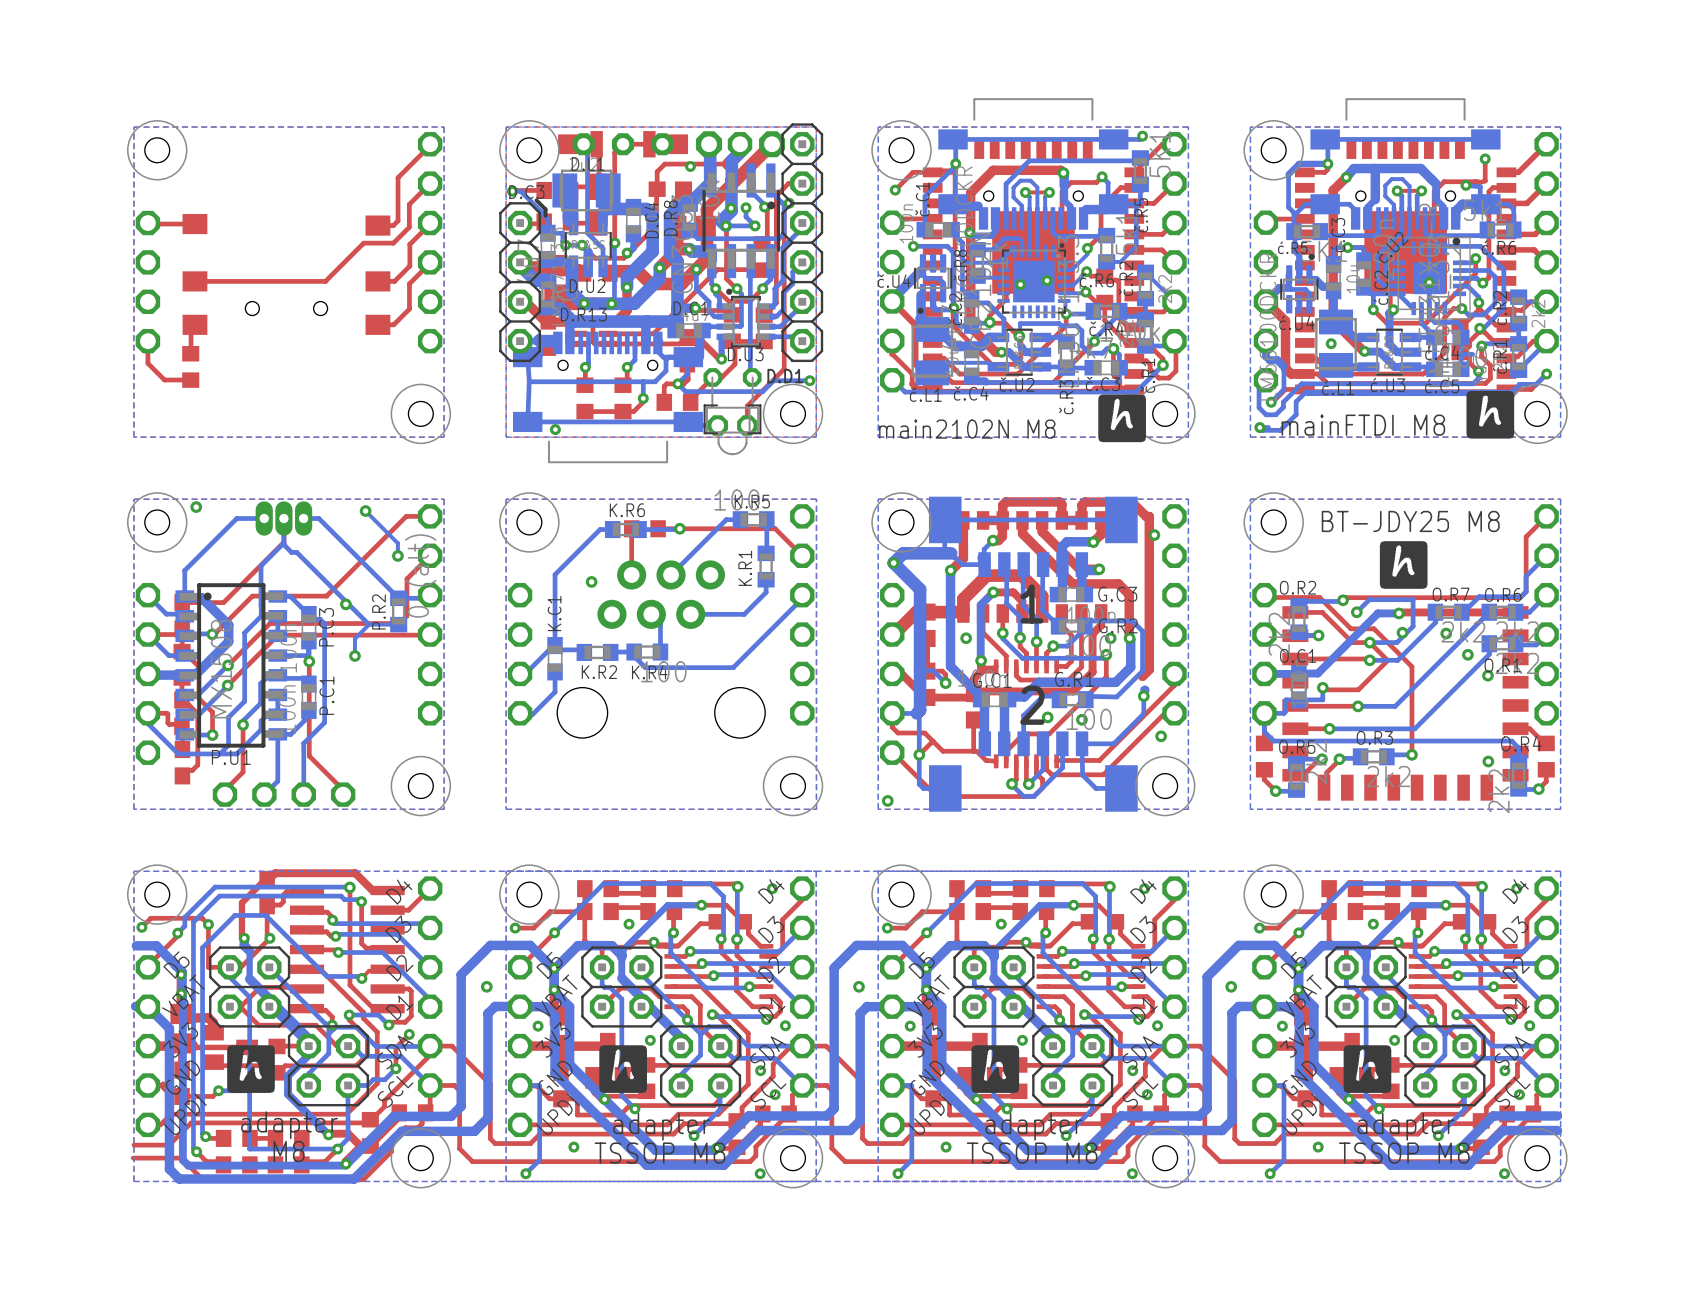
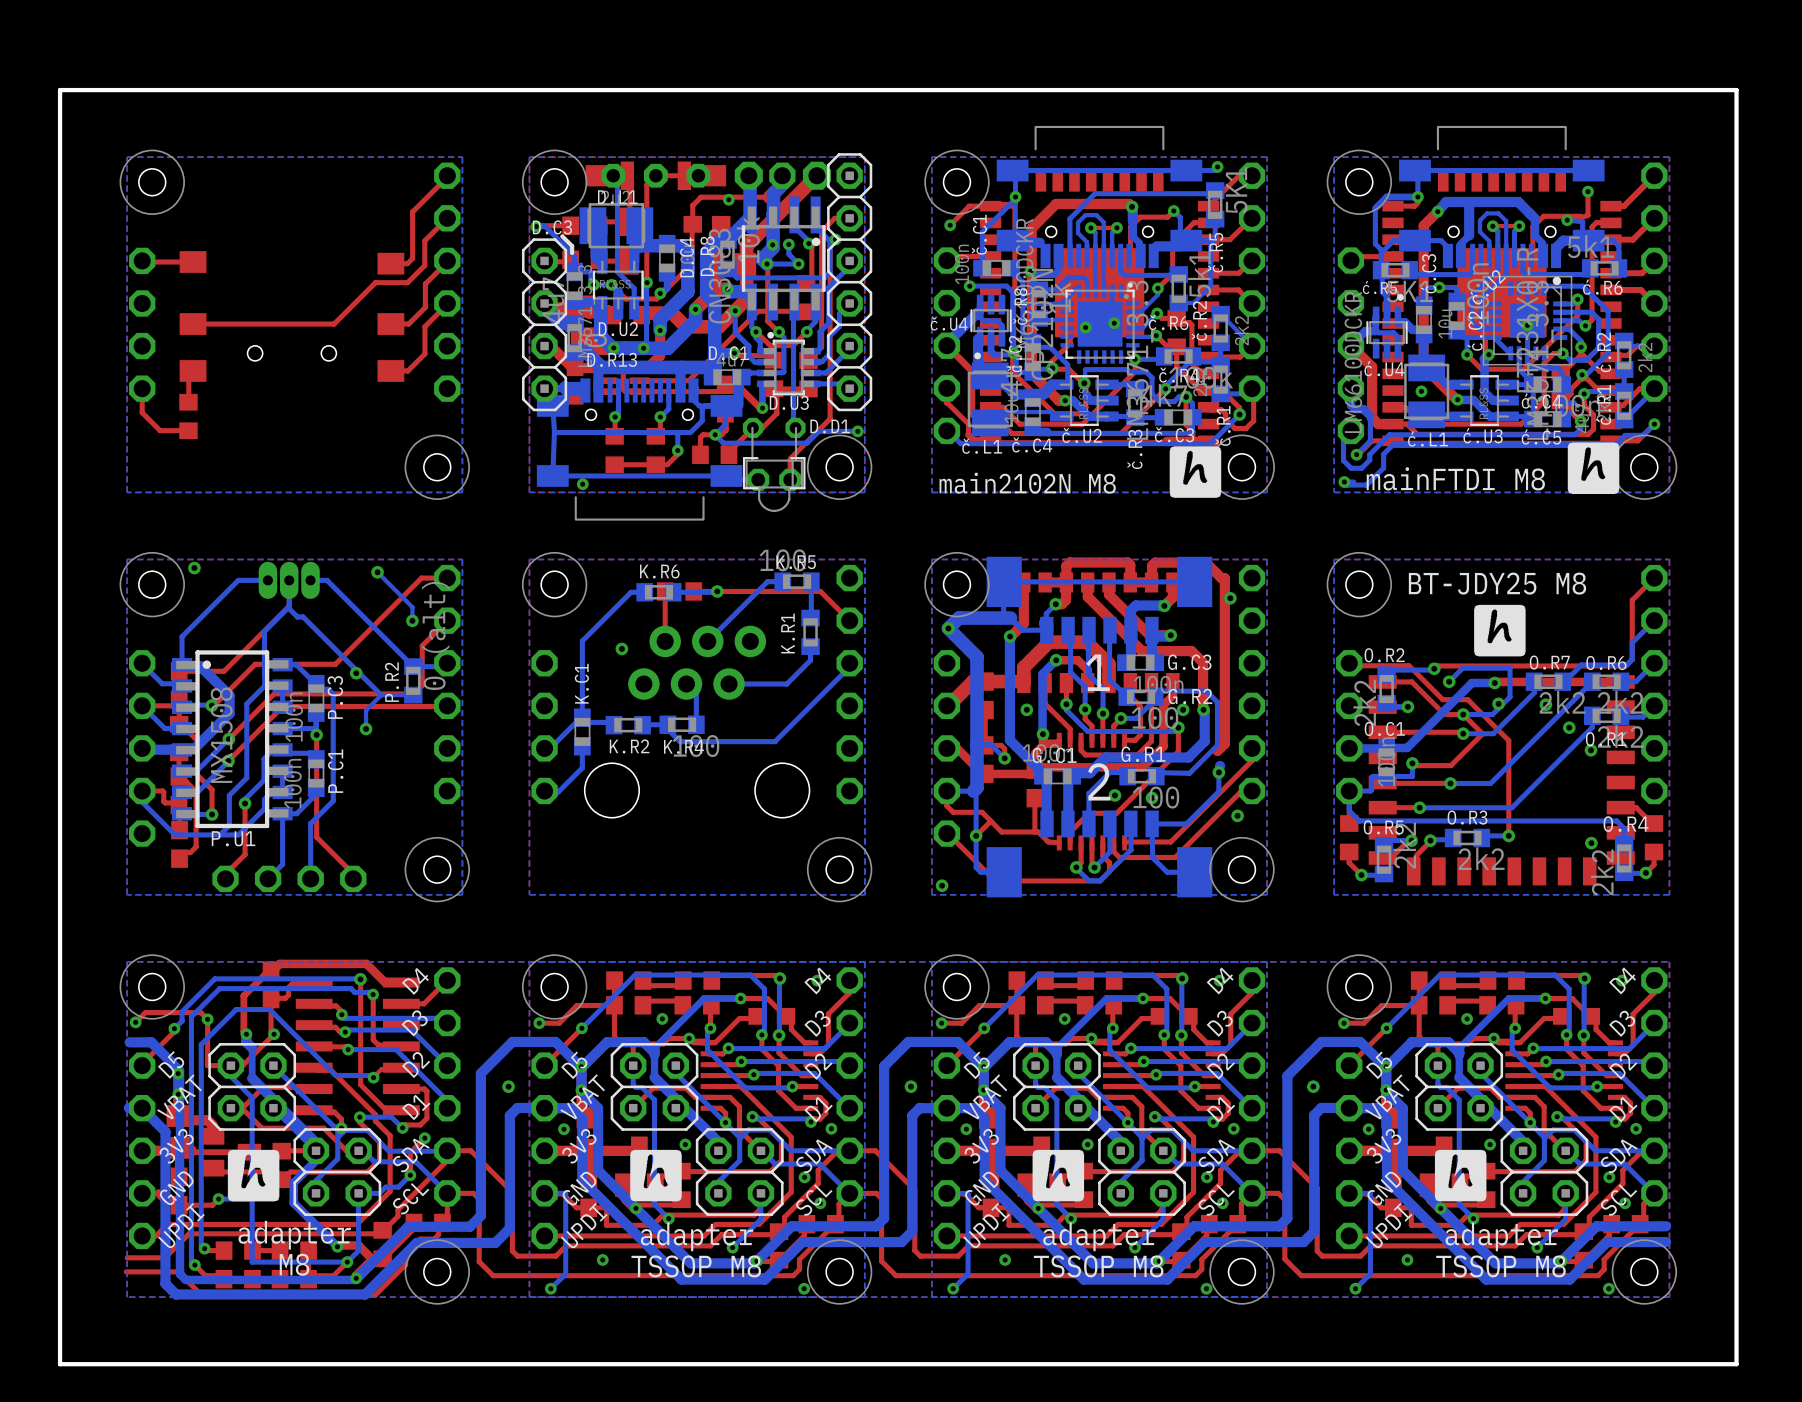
board edge: none -> (1736, 90) (60, 90) (60, 1364) (1736, 1364) (1736, 90)

